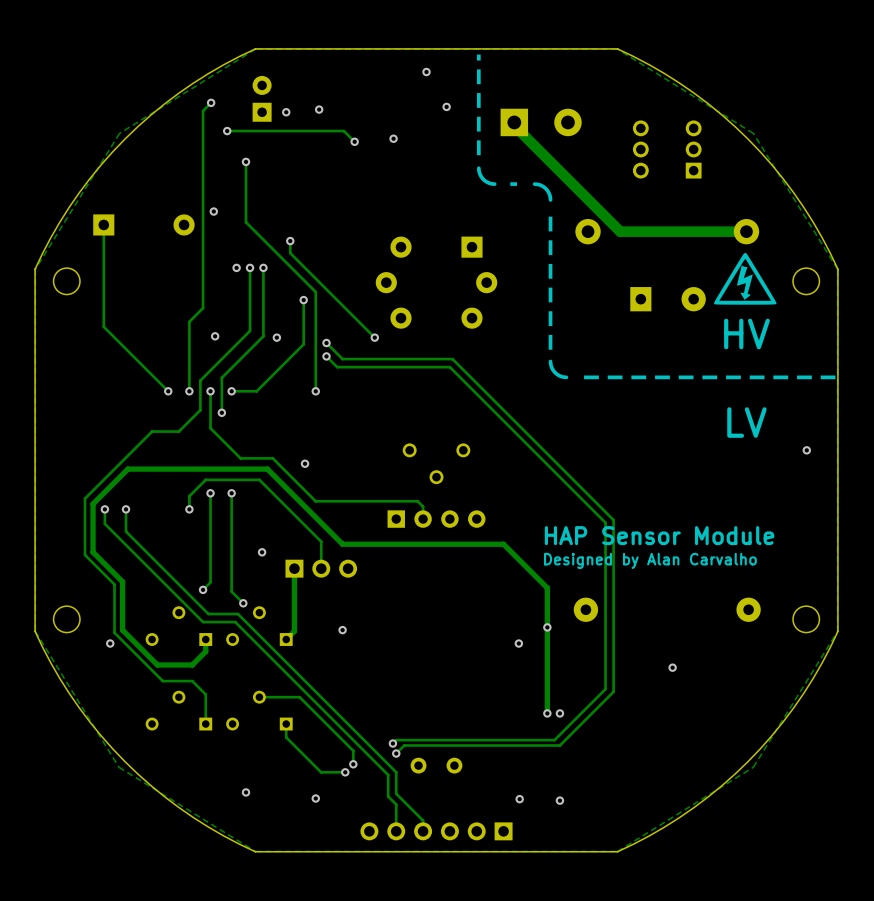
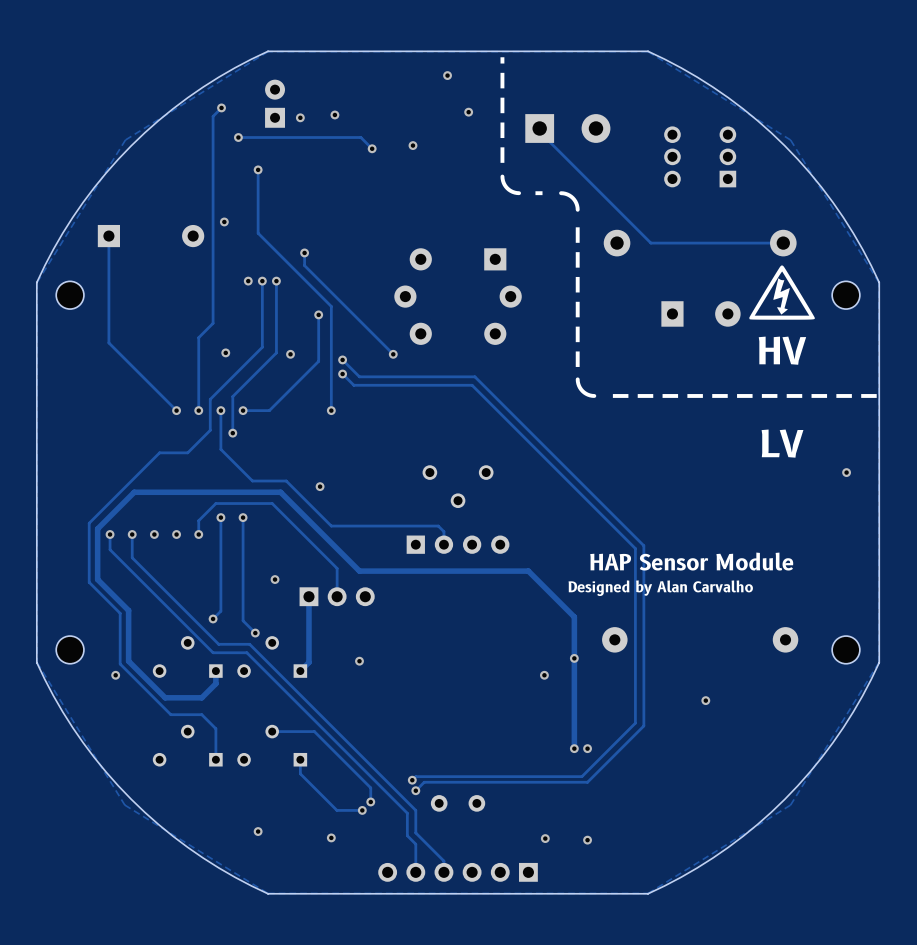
track width: thick (514, 122) (514, 125) (620, 231) (746, 231) -> thin (539, 128) (539, 131) (650, 243) (783, 243)
via: none -> (154, 534)
via: none -> (176, 534)

